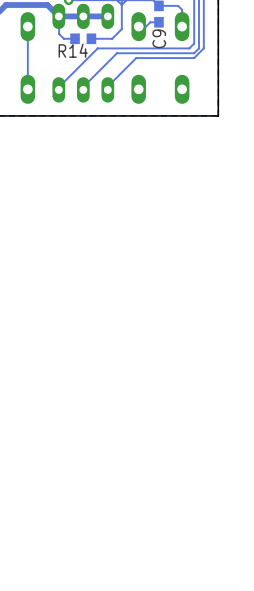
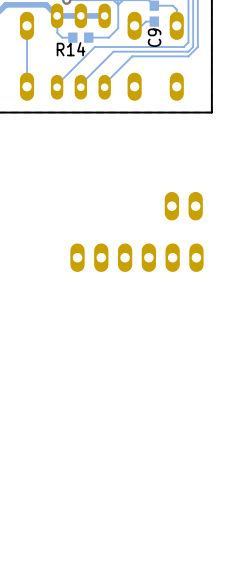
part: none -> (183, 206)
part: none -> (136, 257)

